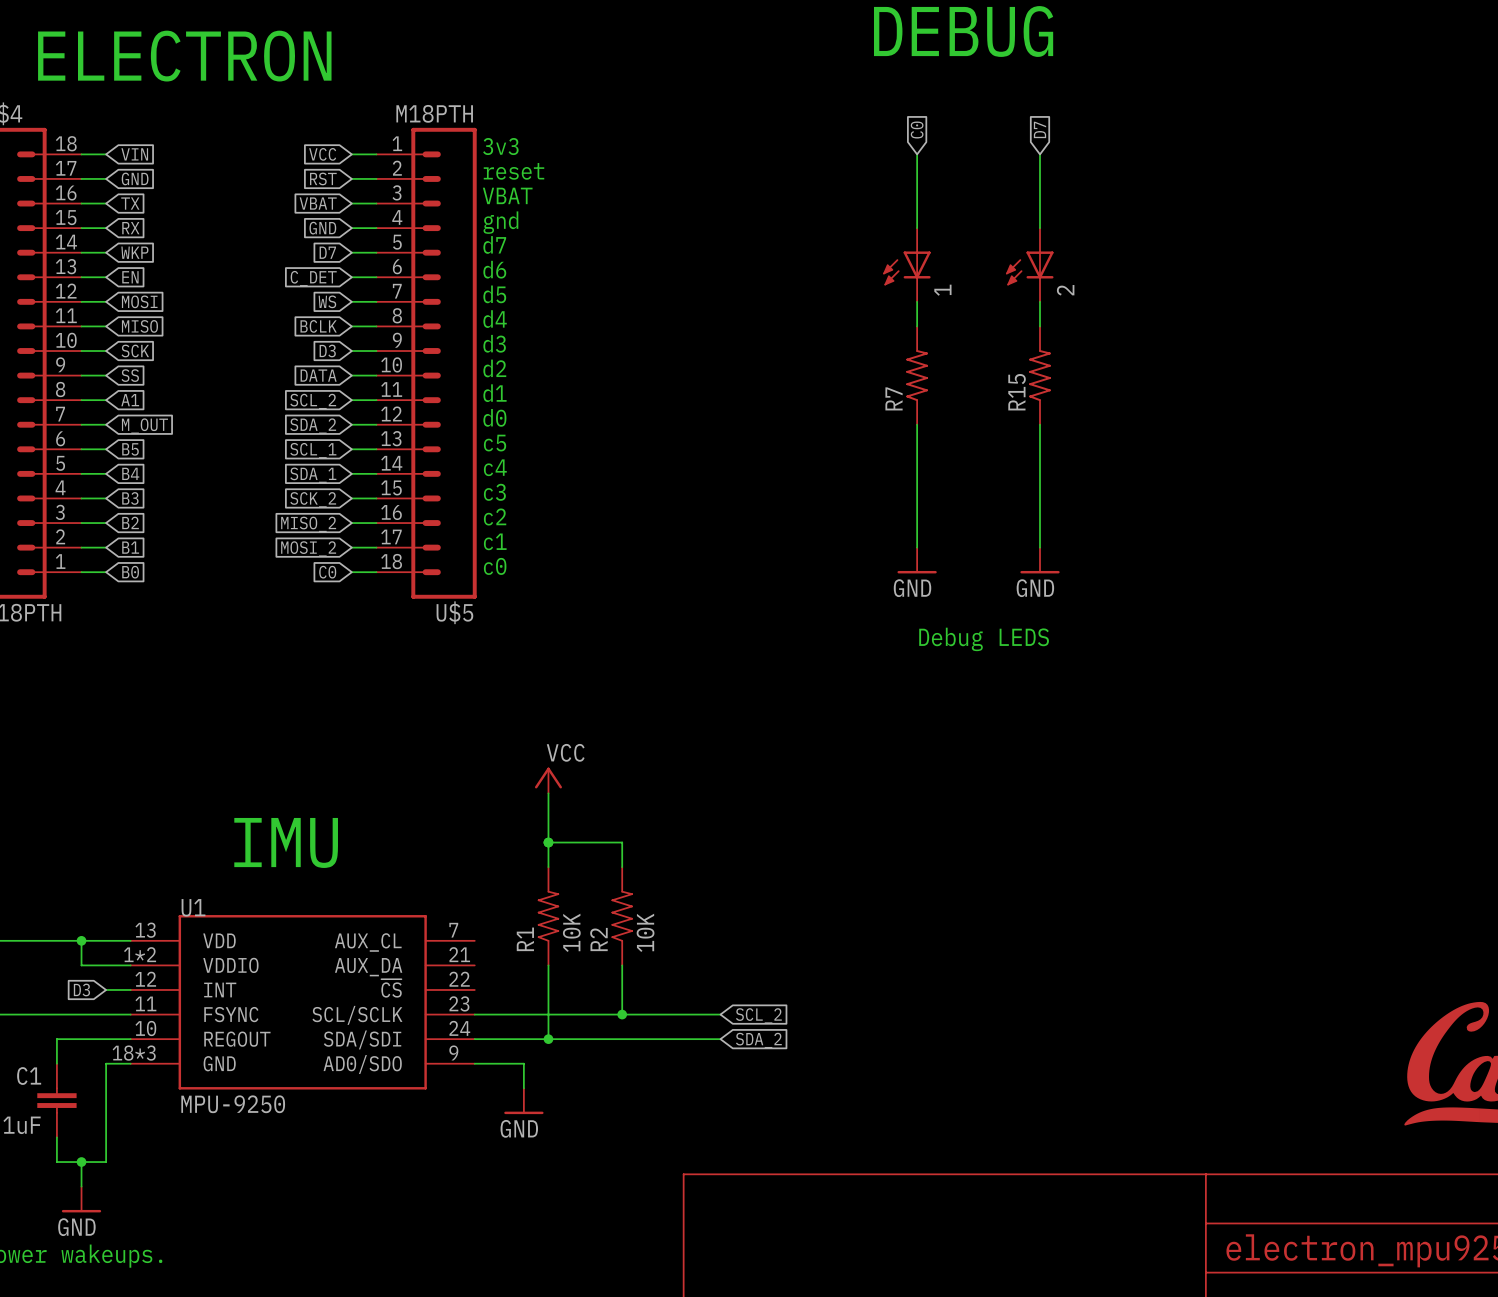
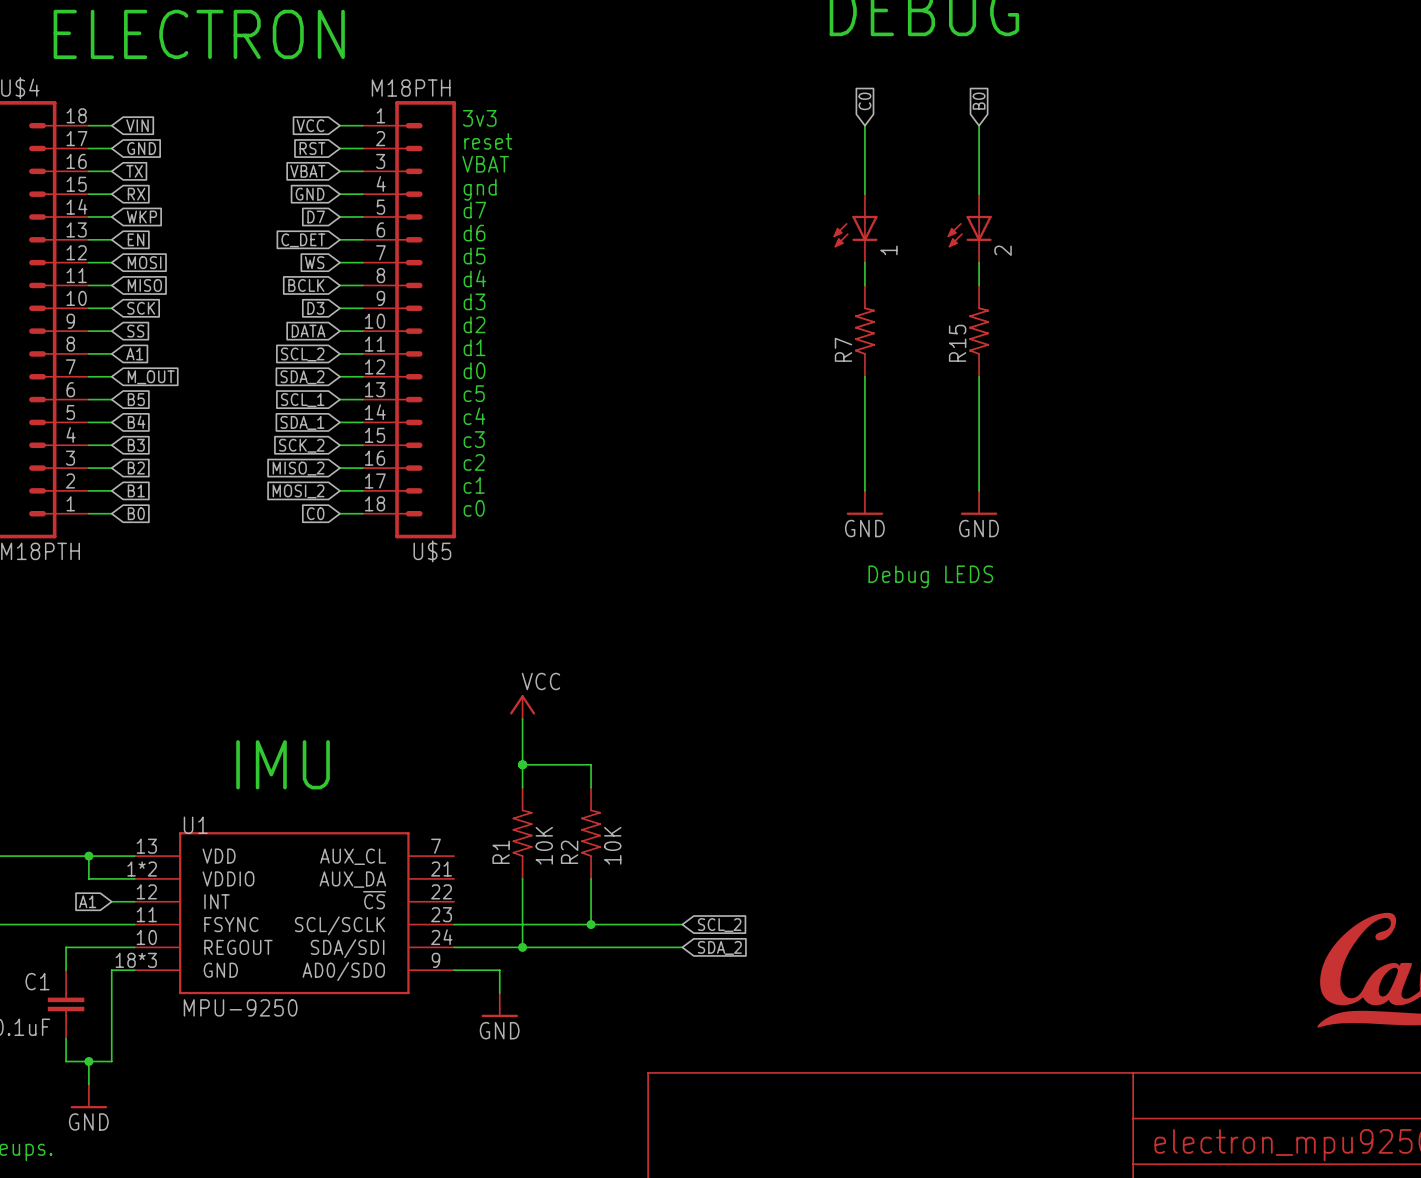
global label: D7 (1040, 129) -> B0 (979, 101)
global label: D3 (81, 989) -> A1 (87, 901)

